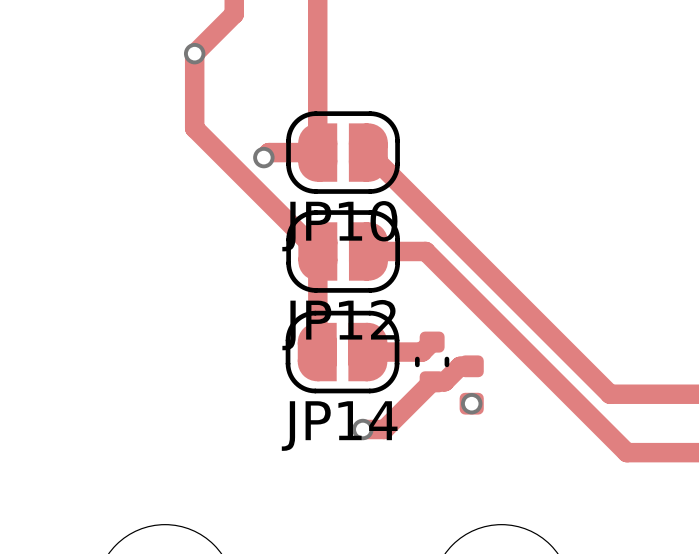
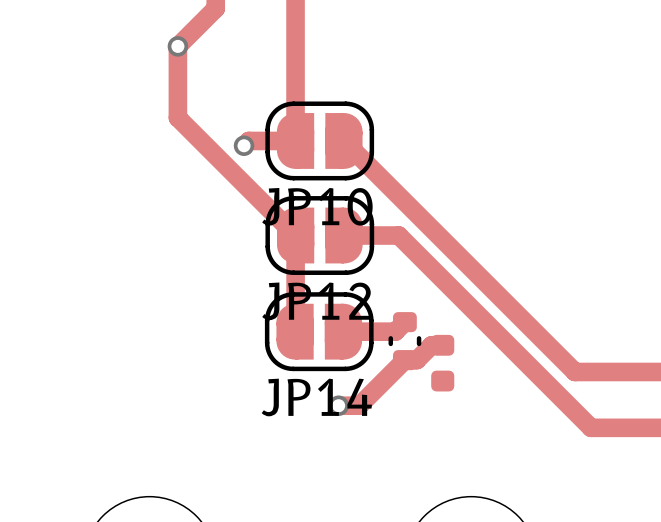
via: (471, 403) -> none

